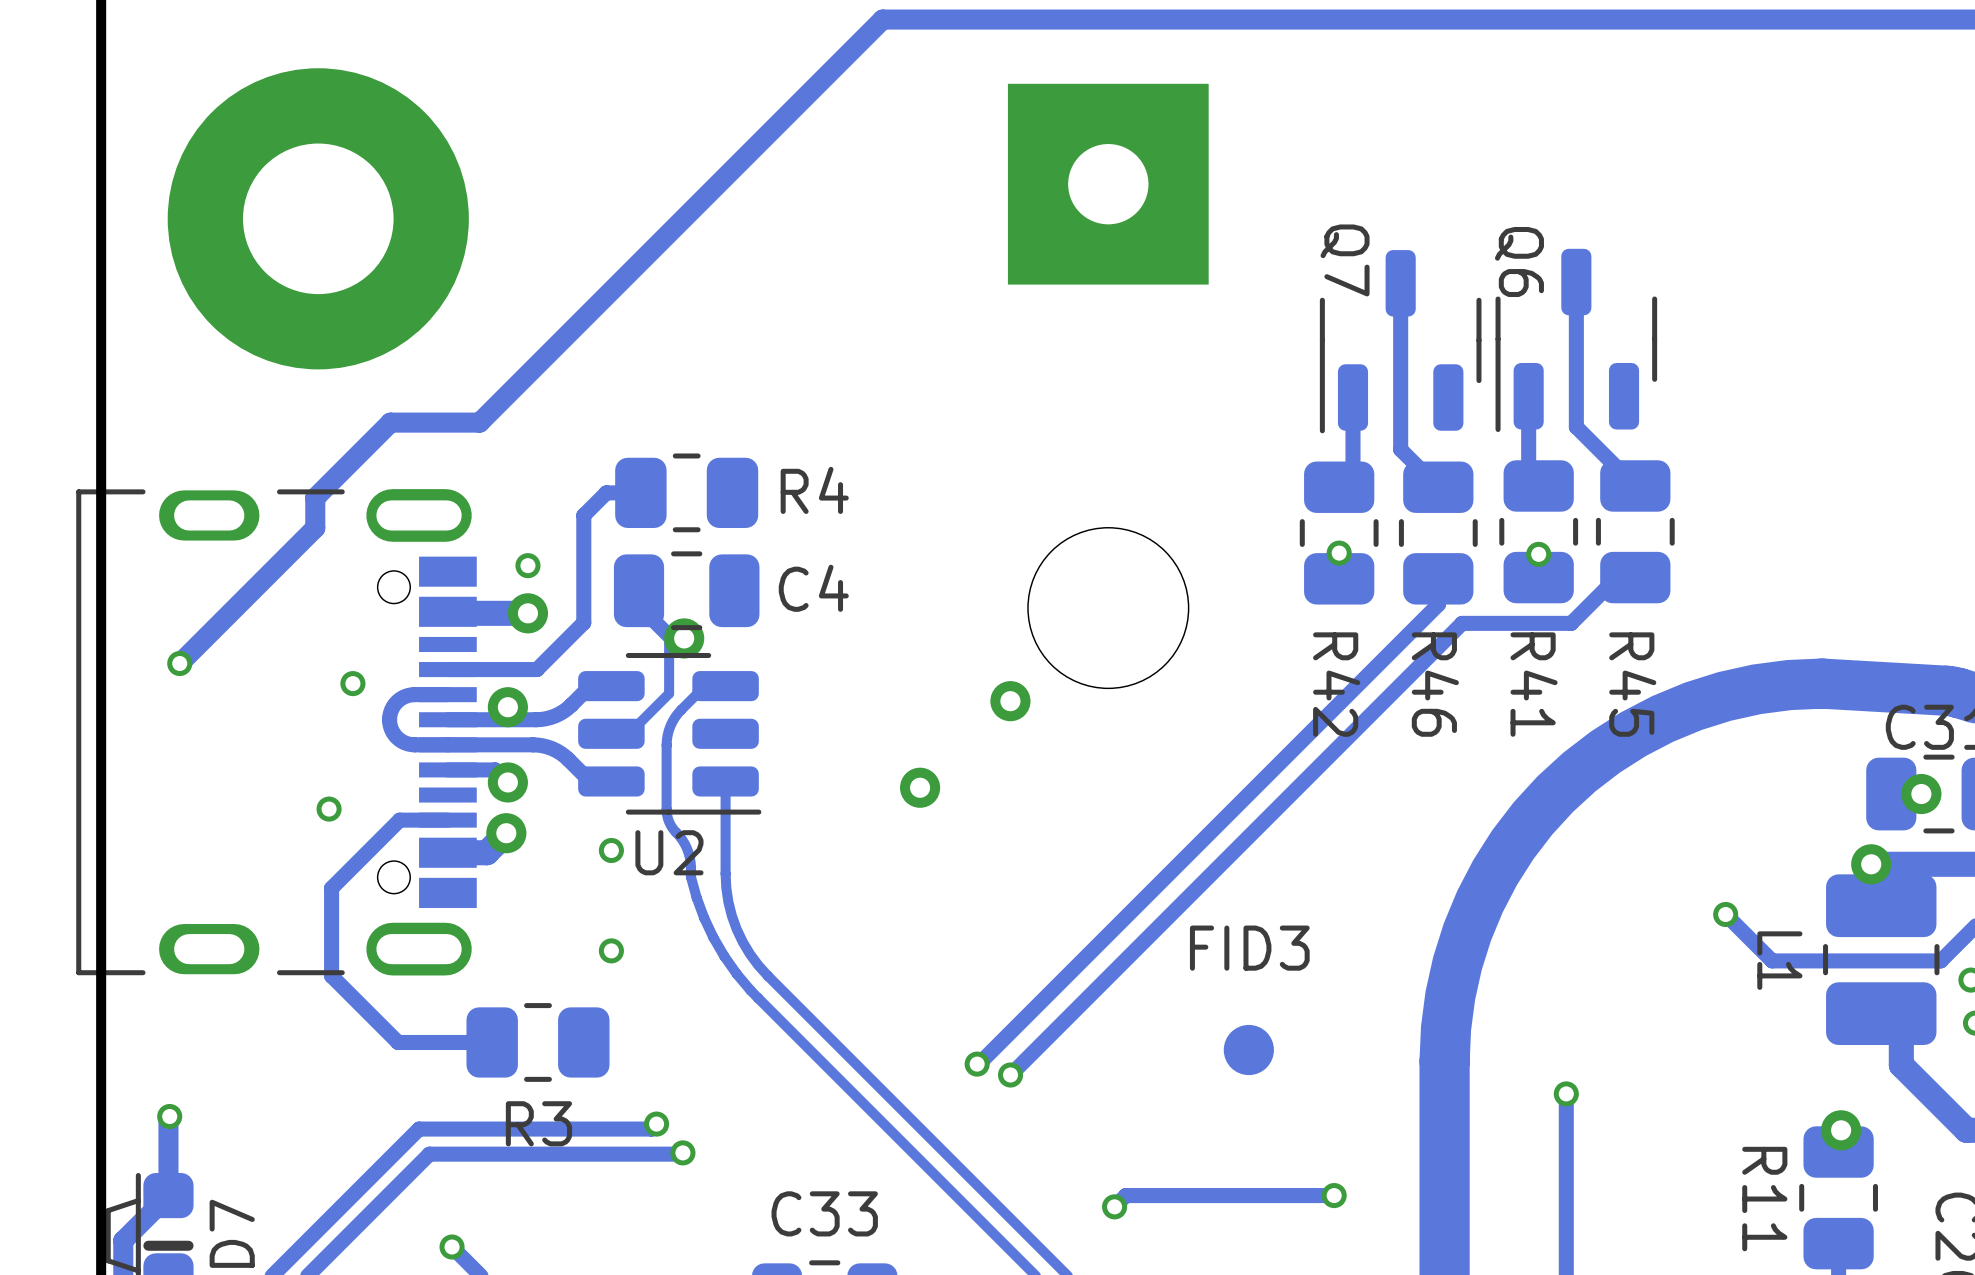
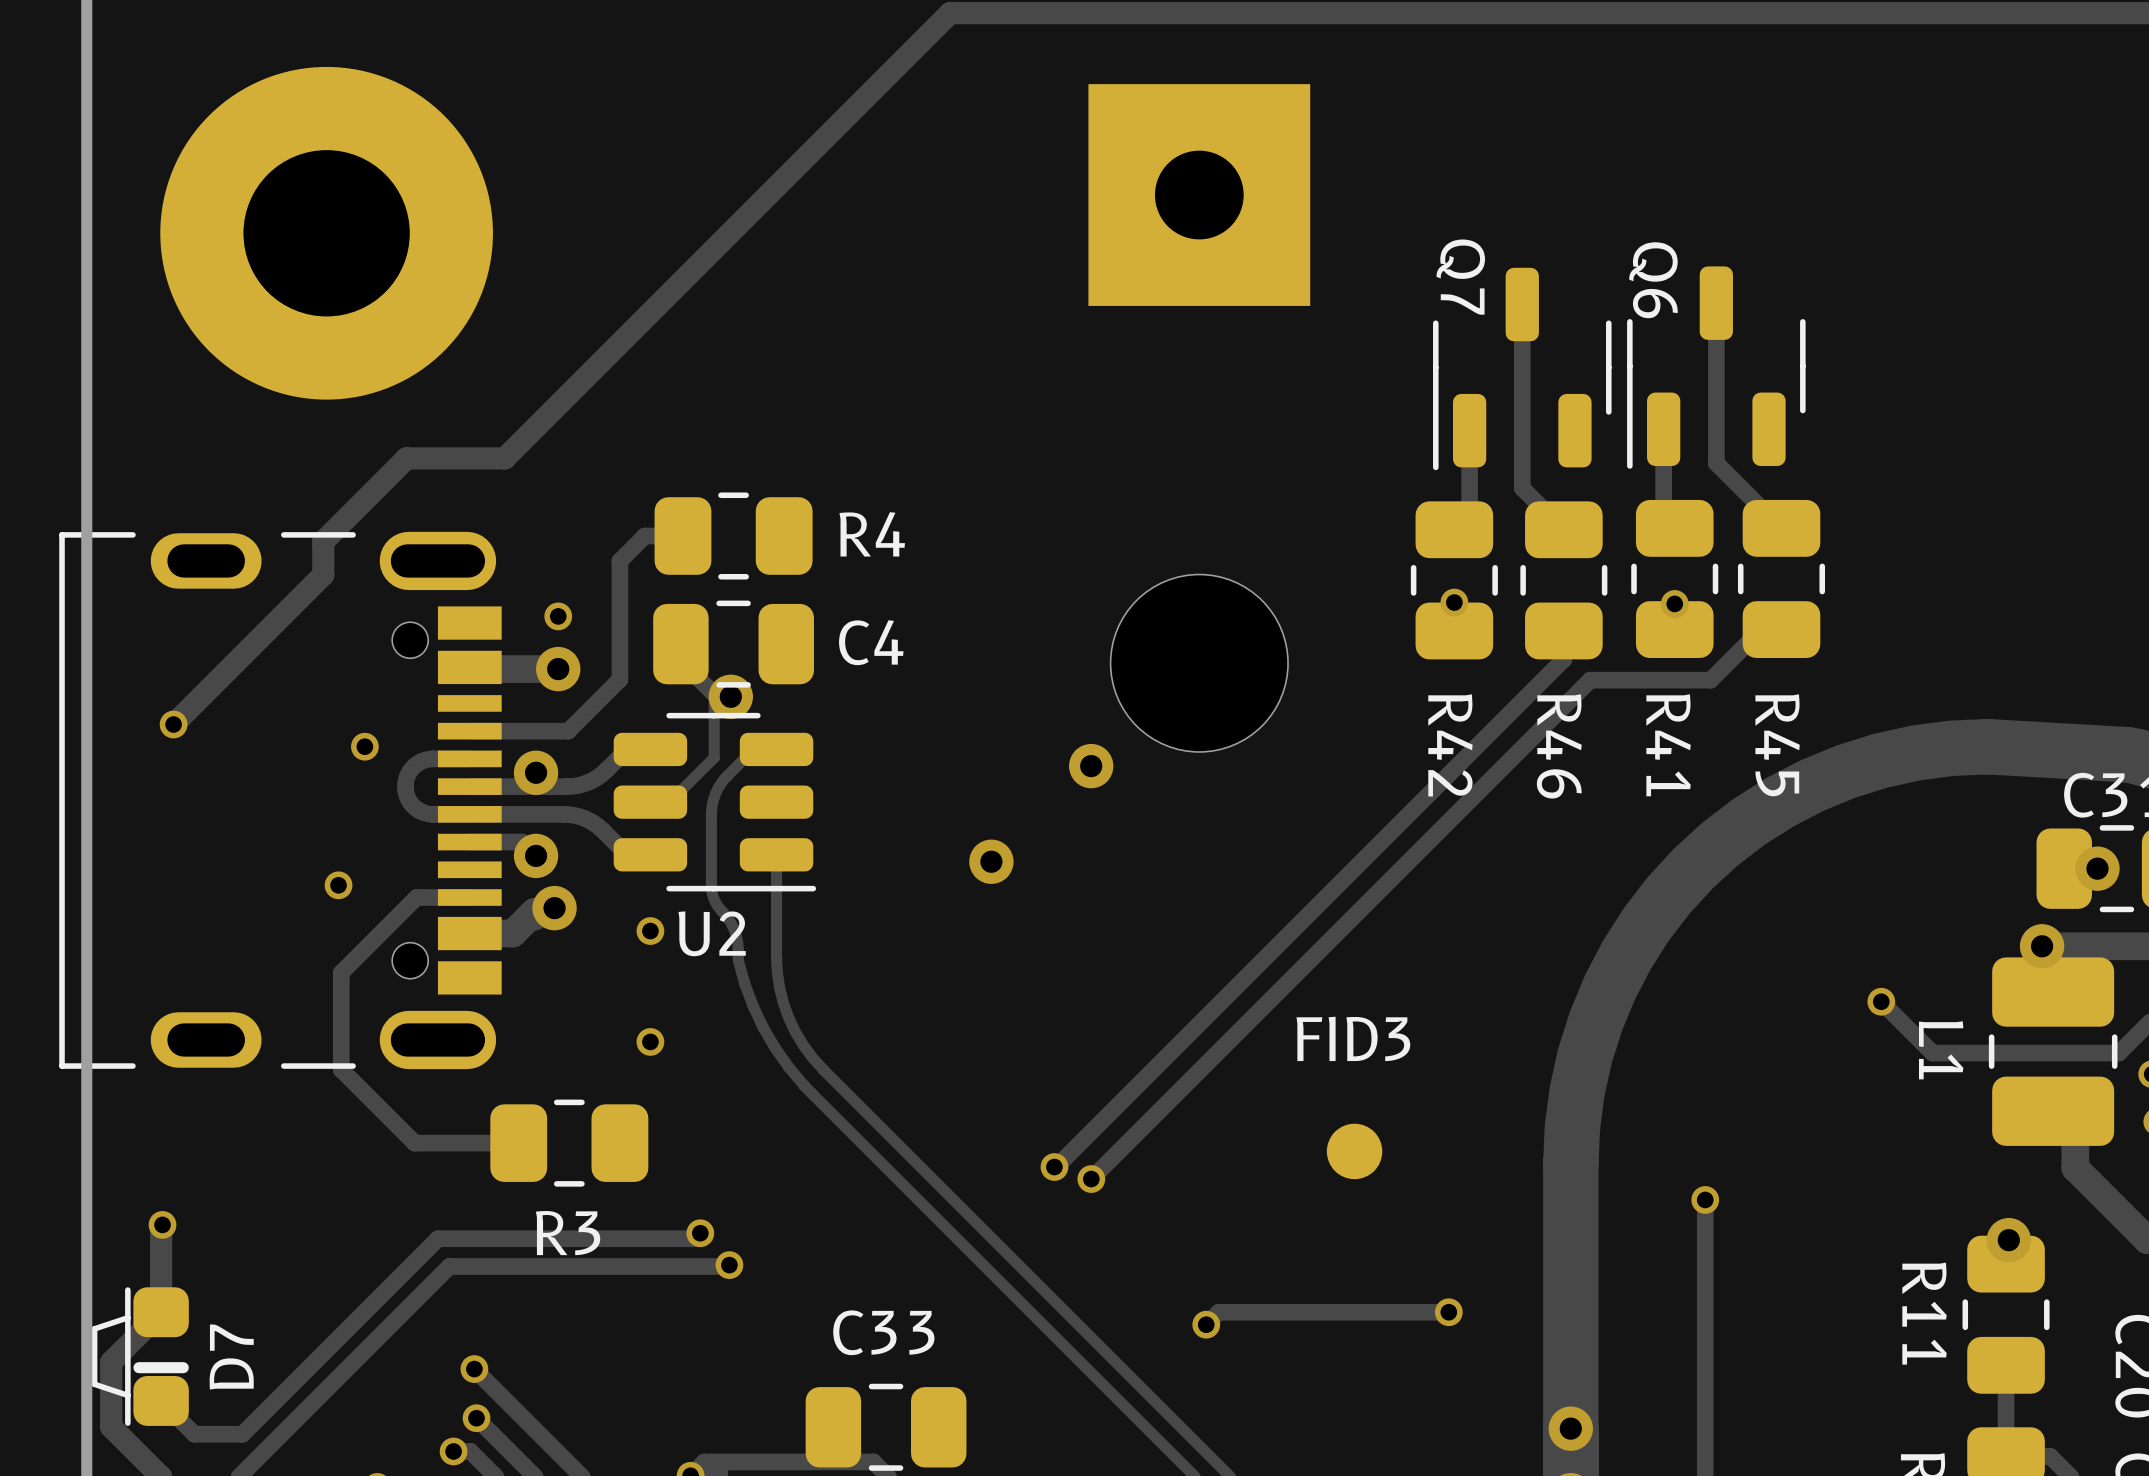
via position: (506, 833) -> (554, 908)

